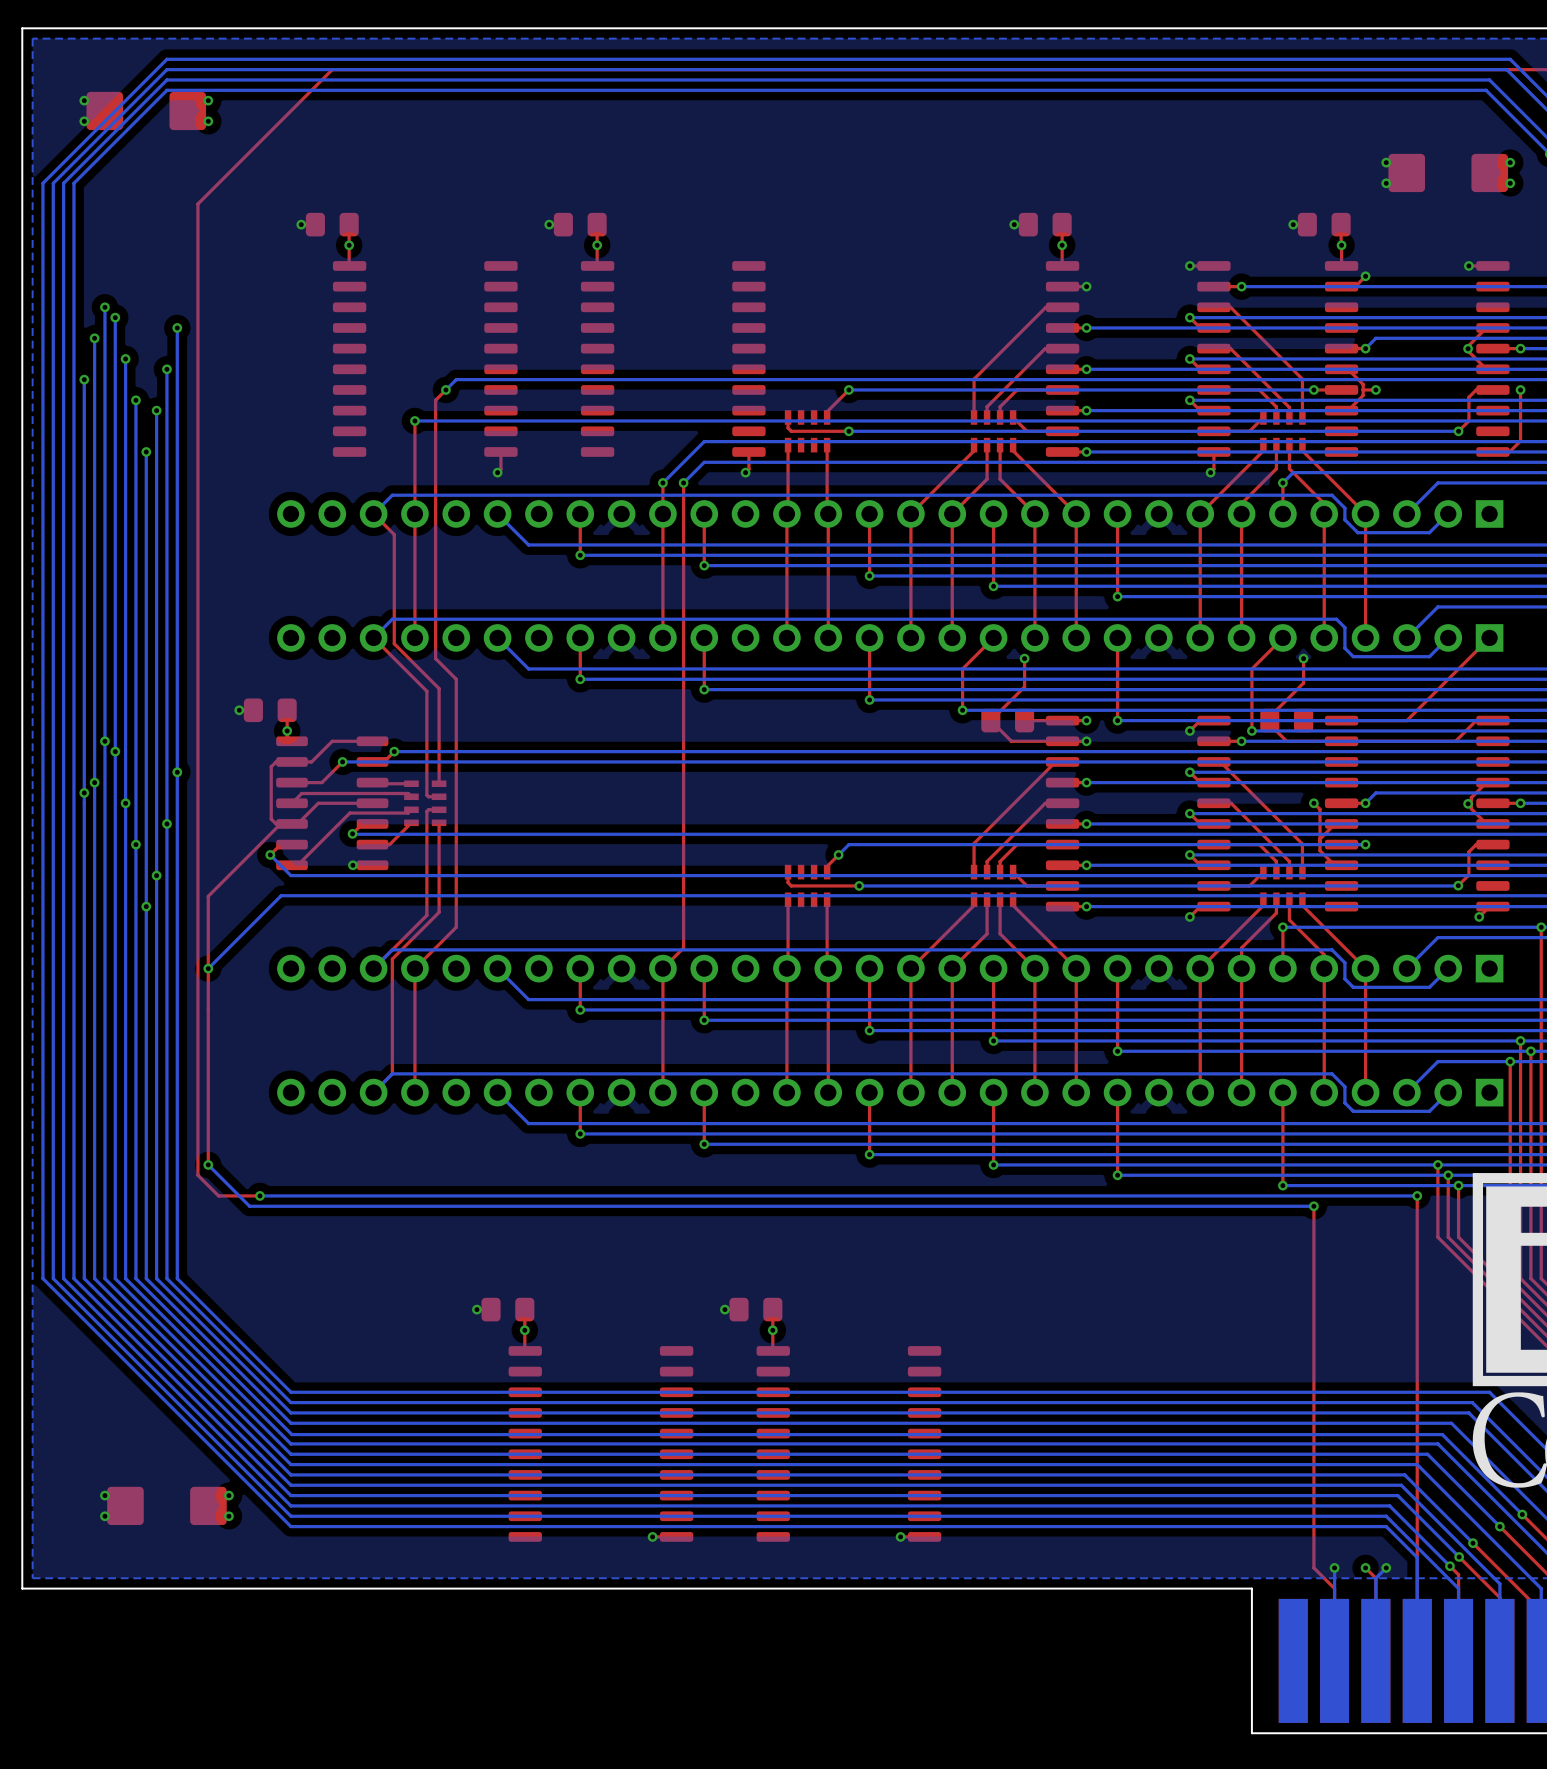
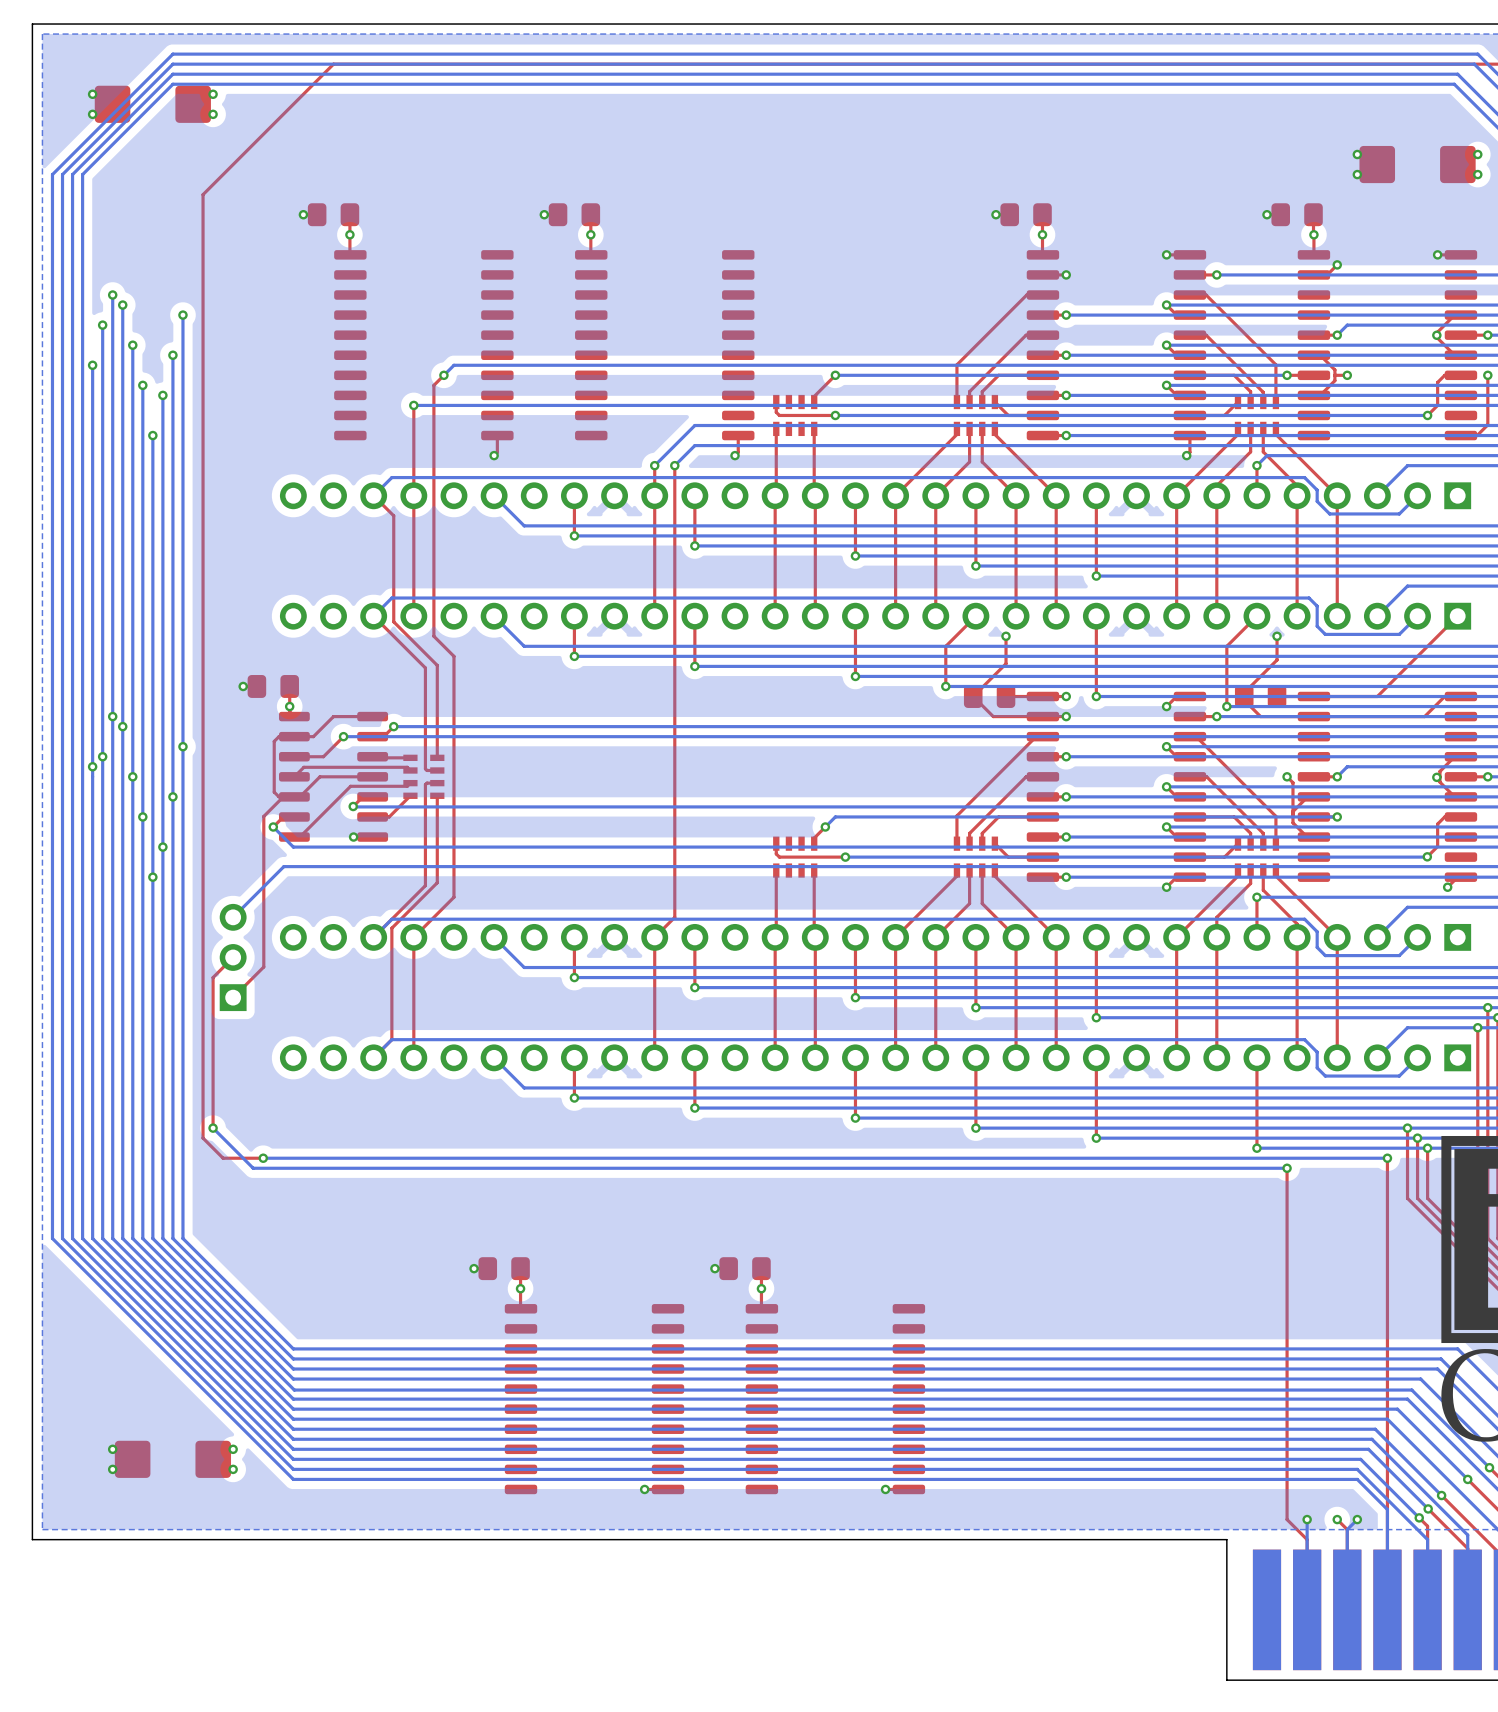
top track: (260, 844) (208, 896) (208, 1009) -> (263, 816) (263, 966) (233, 997)
bottom track: (228, 947) (208, 968) -> none
via: (208, 968) -> none
top track: none -> (233, 957) (213, 977)
part: none -> (233, 957)

